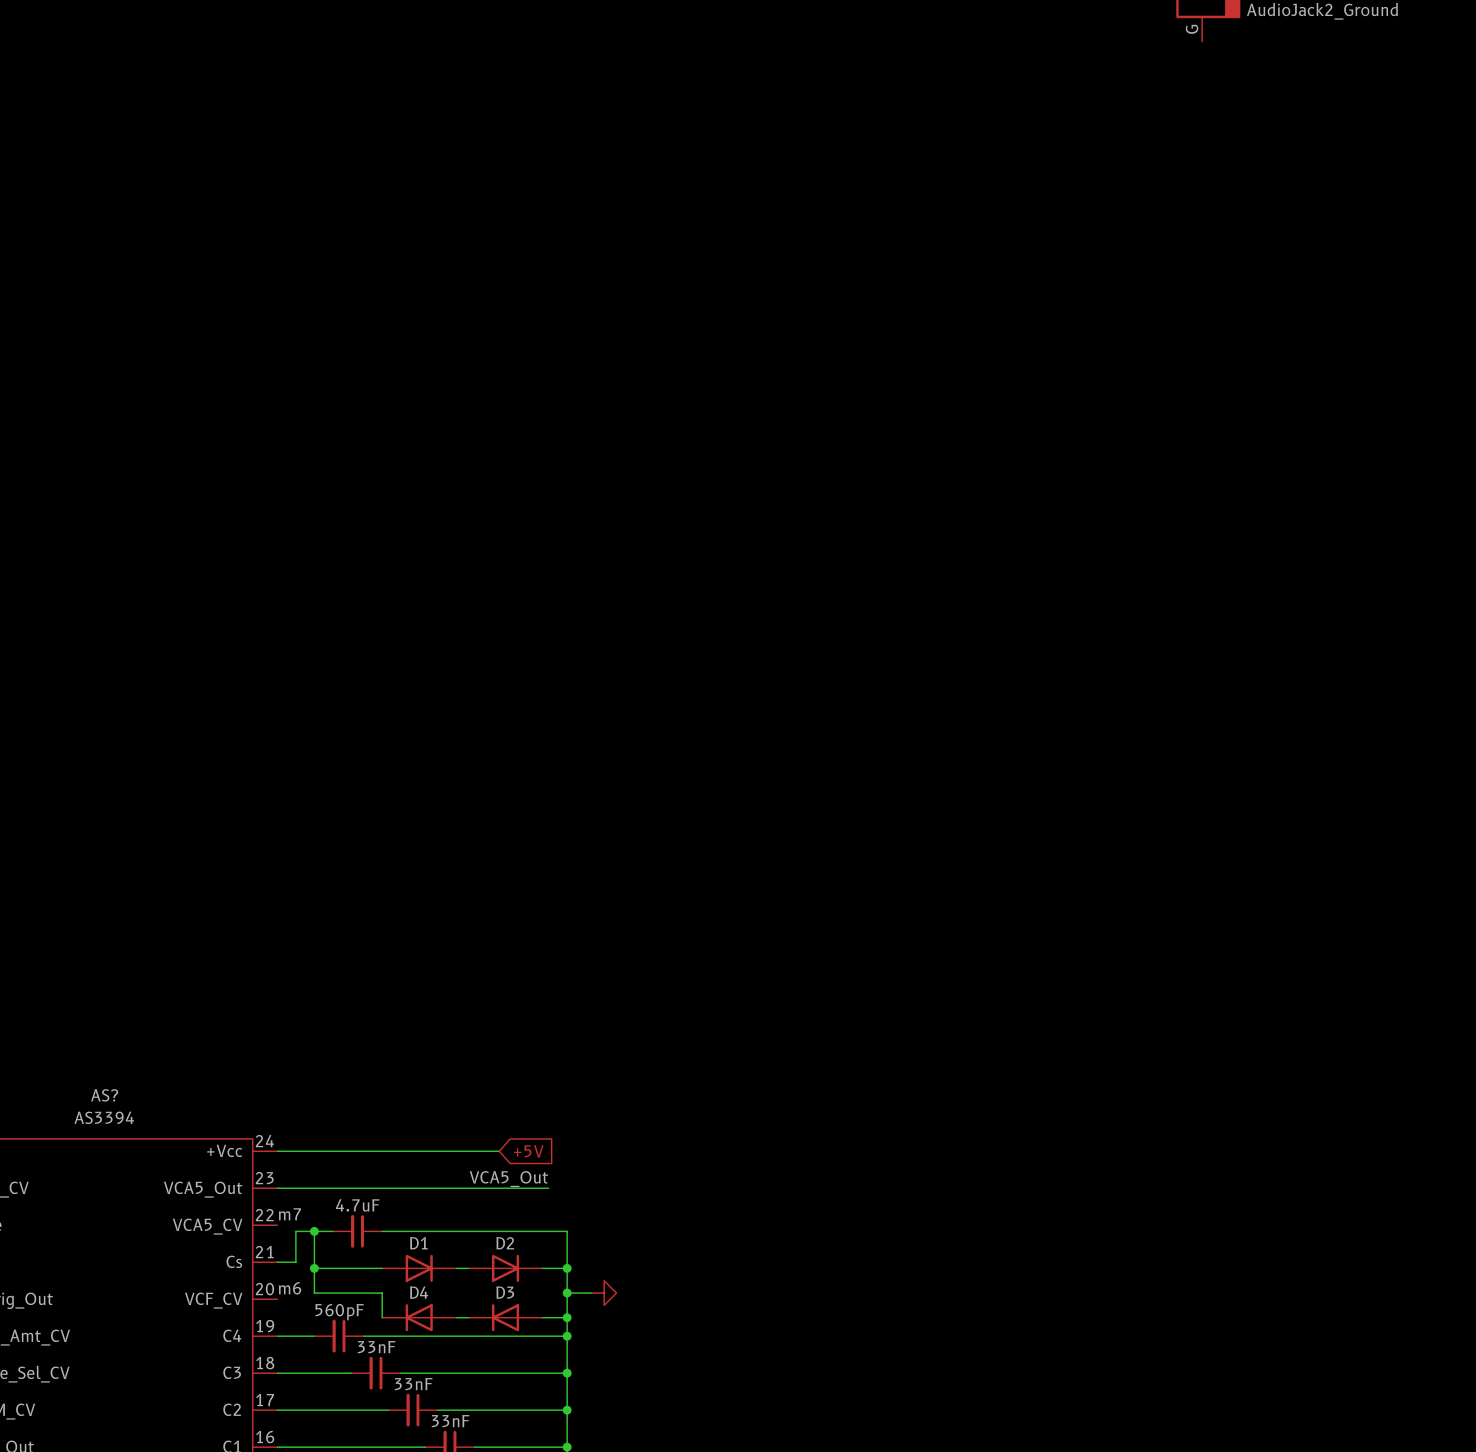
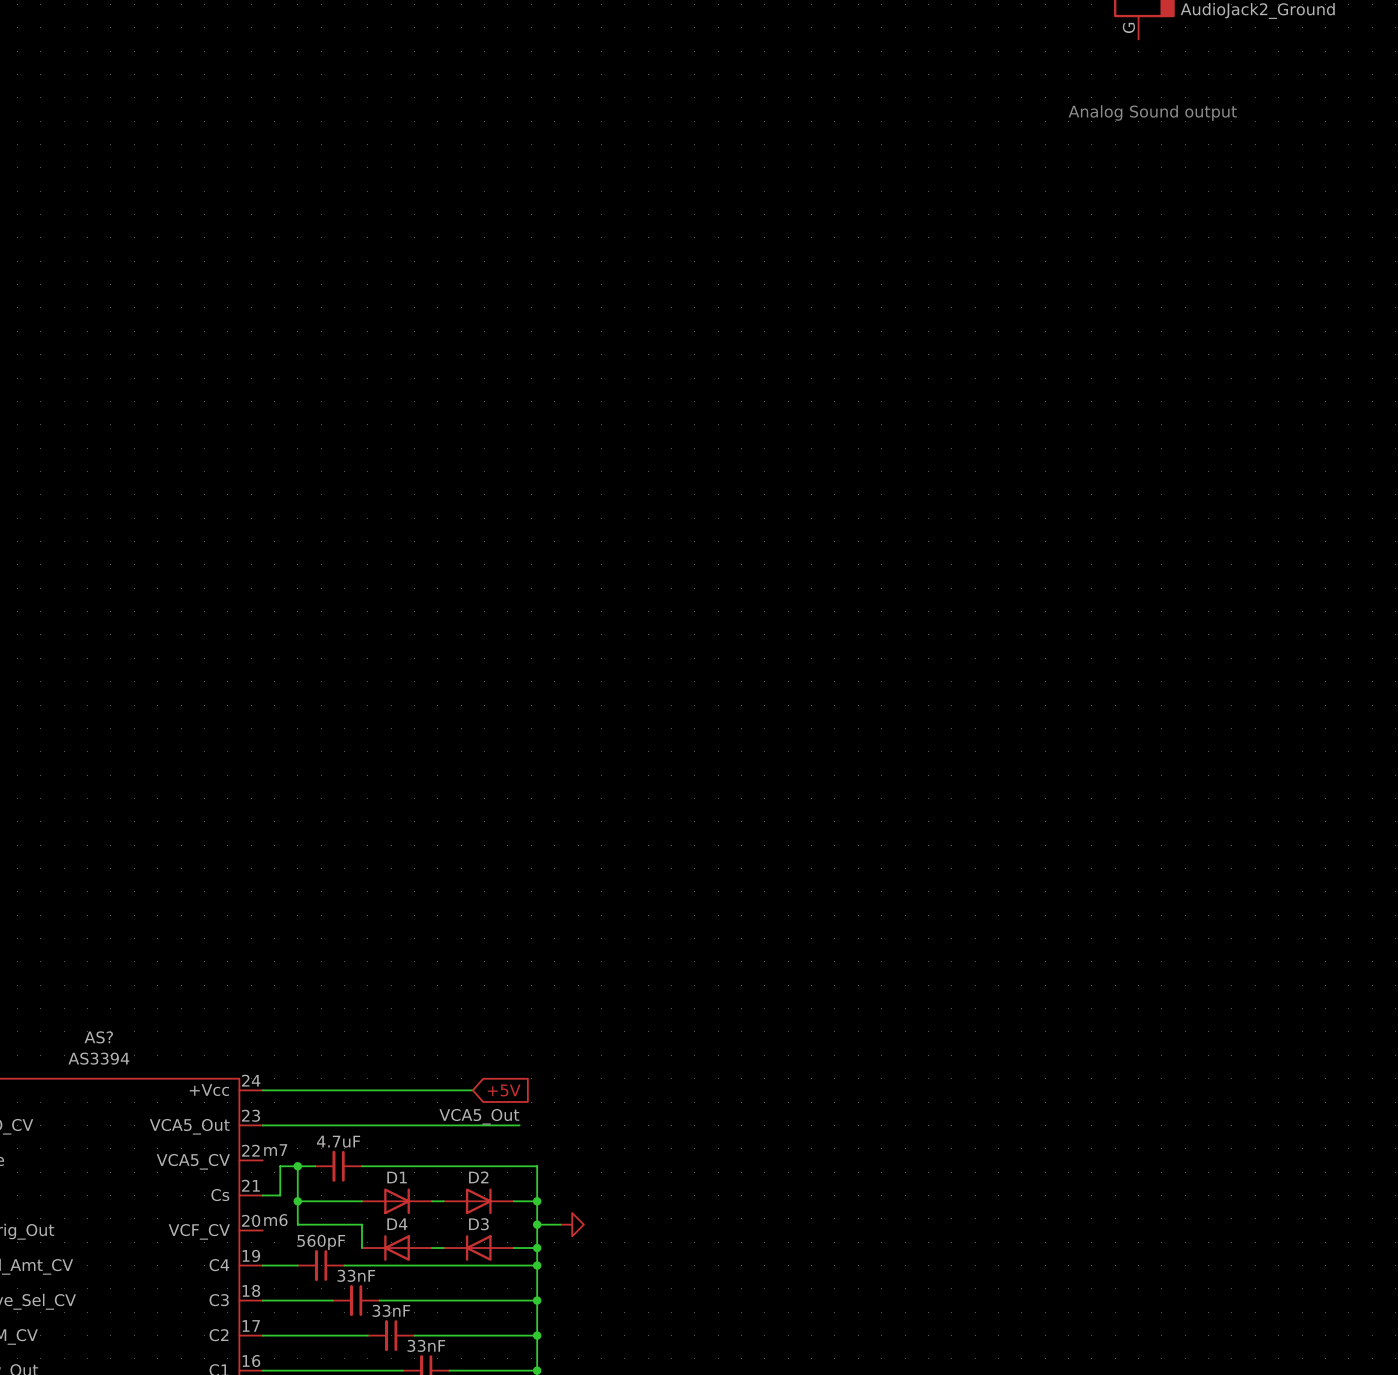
text: none -> Analog Sound output (1152, 113)

